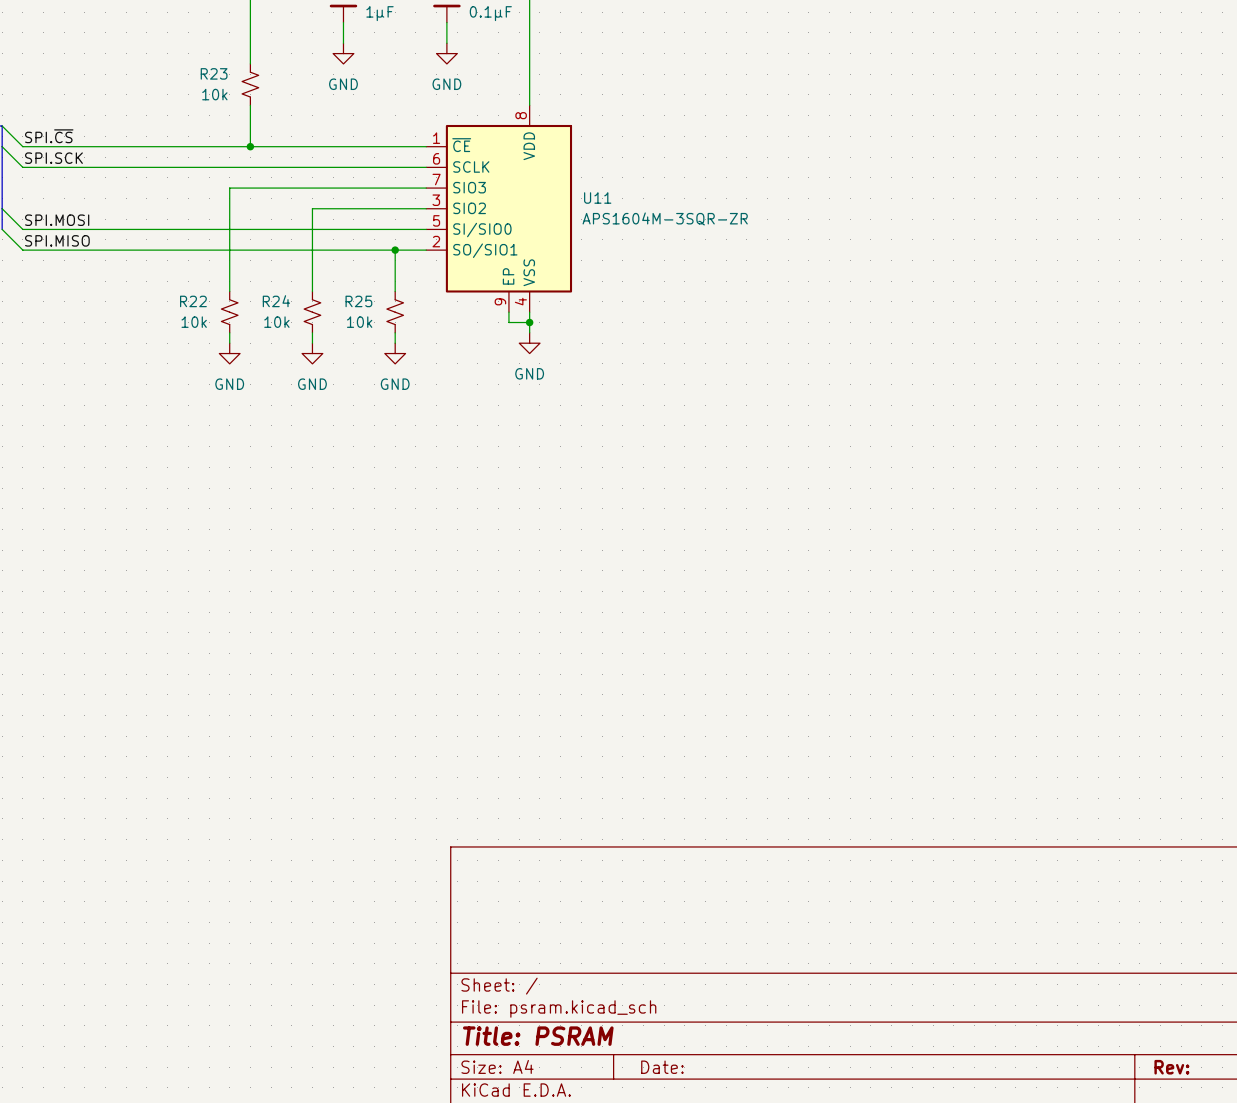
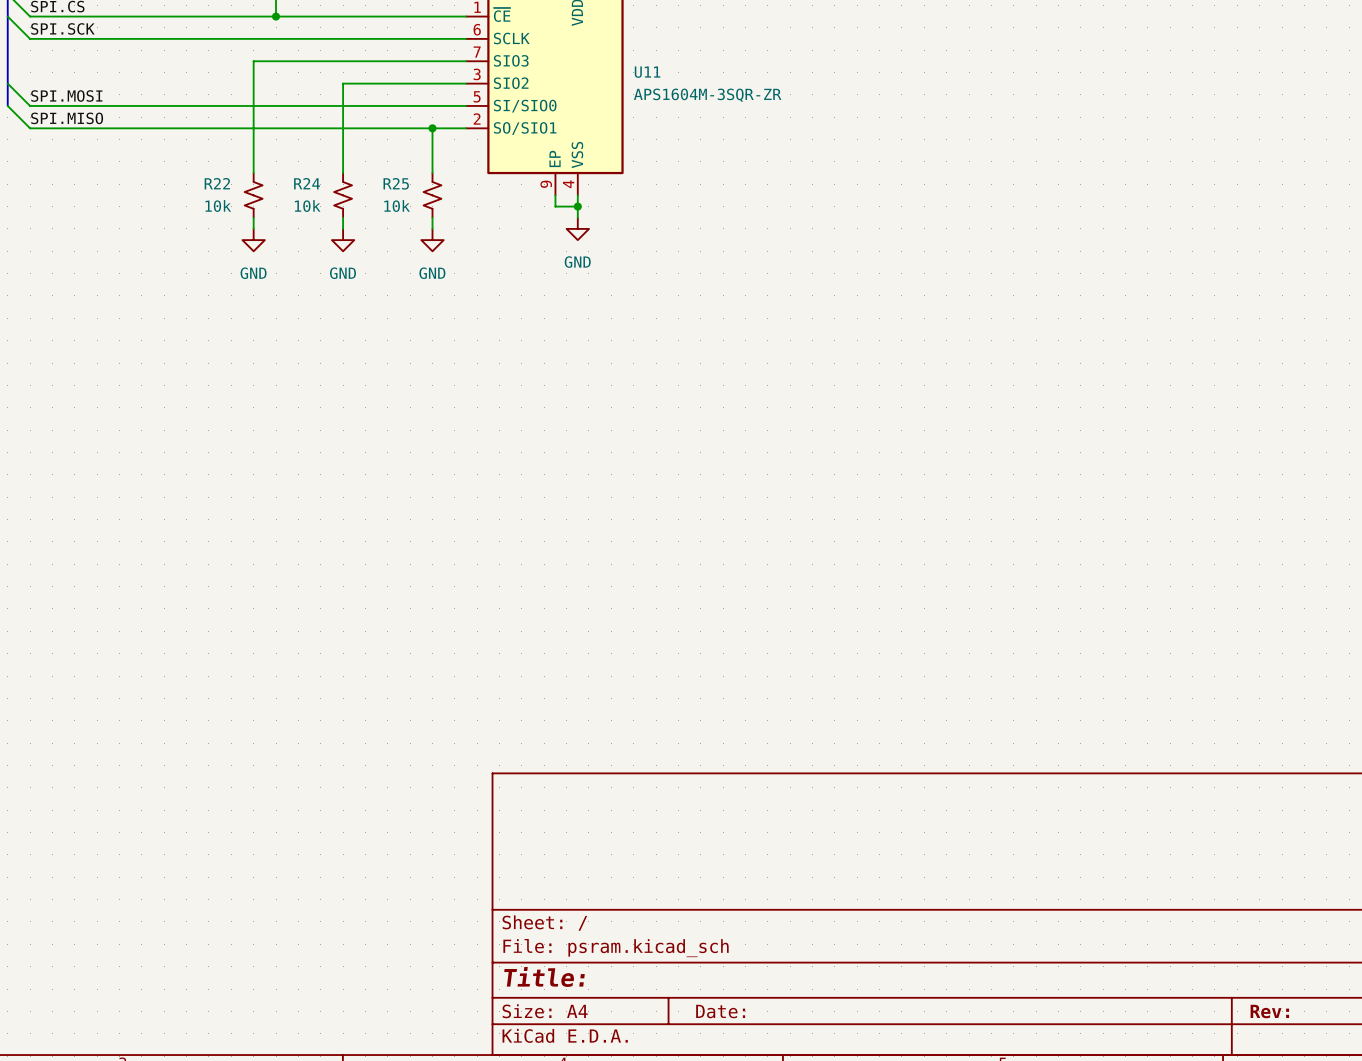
title block: Title: PSRAM (538, 1036) -> Title: (544, 976)

